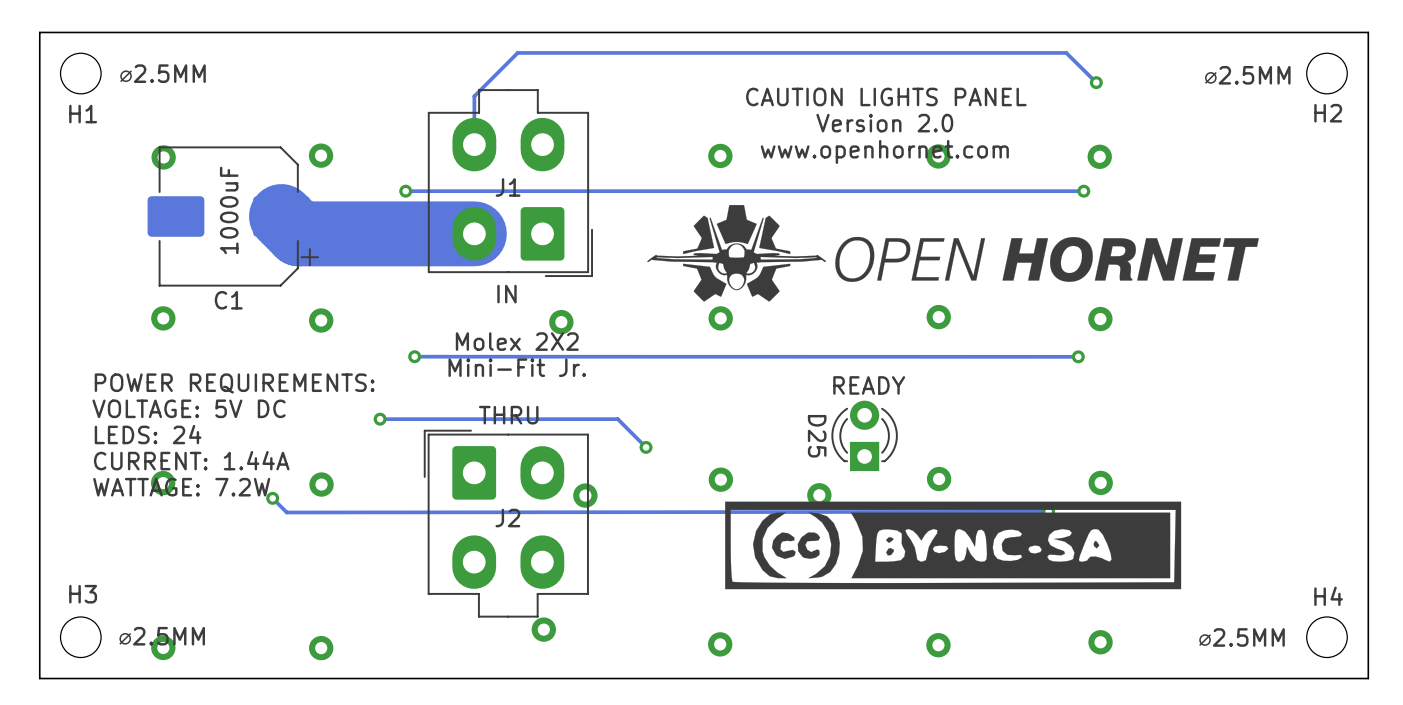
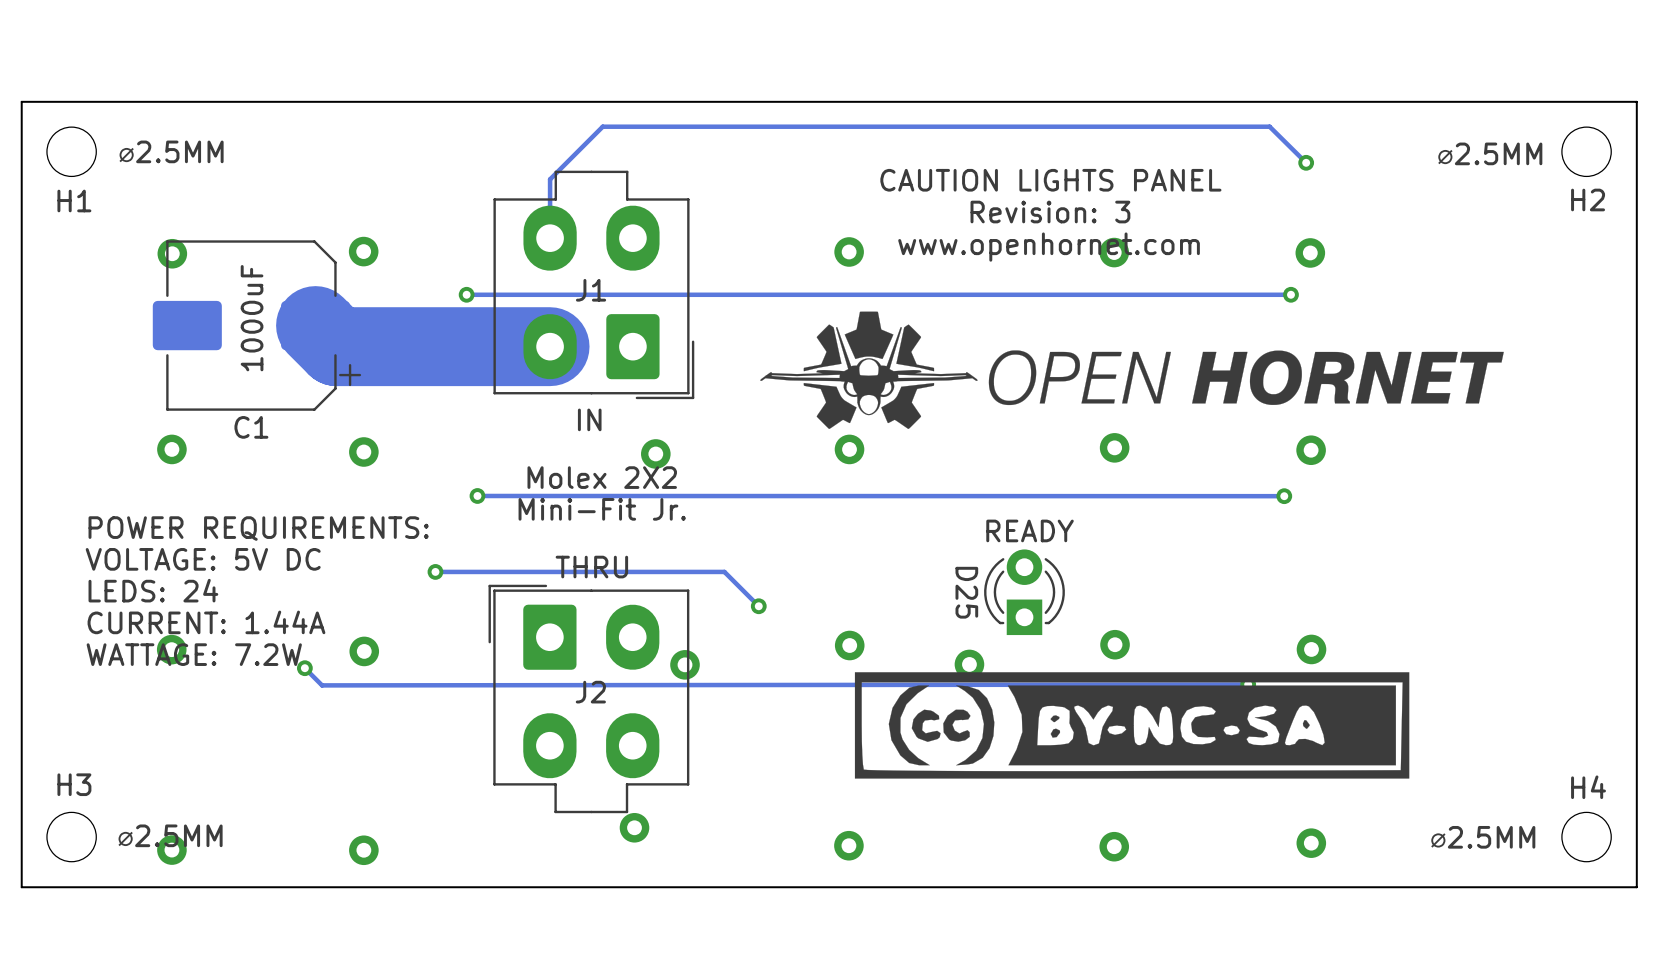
text: Version 2.0 (884, 123) -> Revision: 3 (1050, 212)

